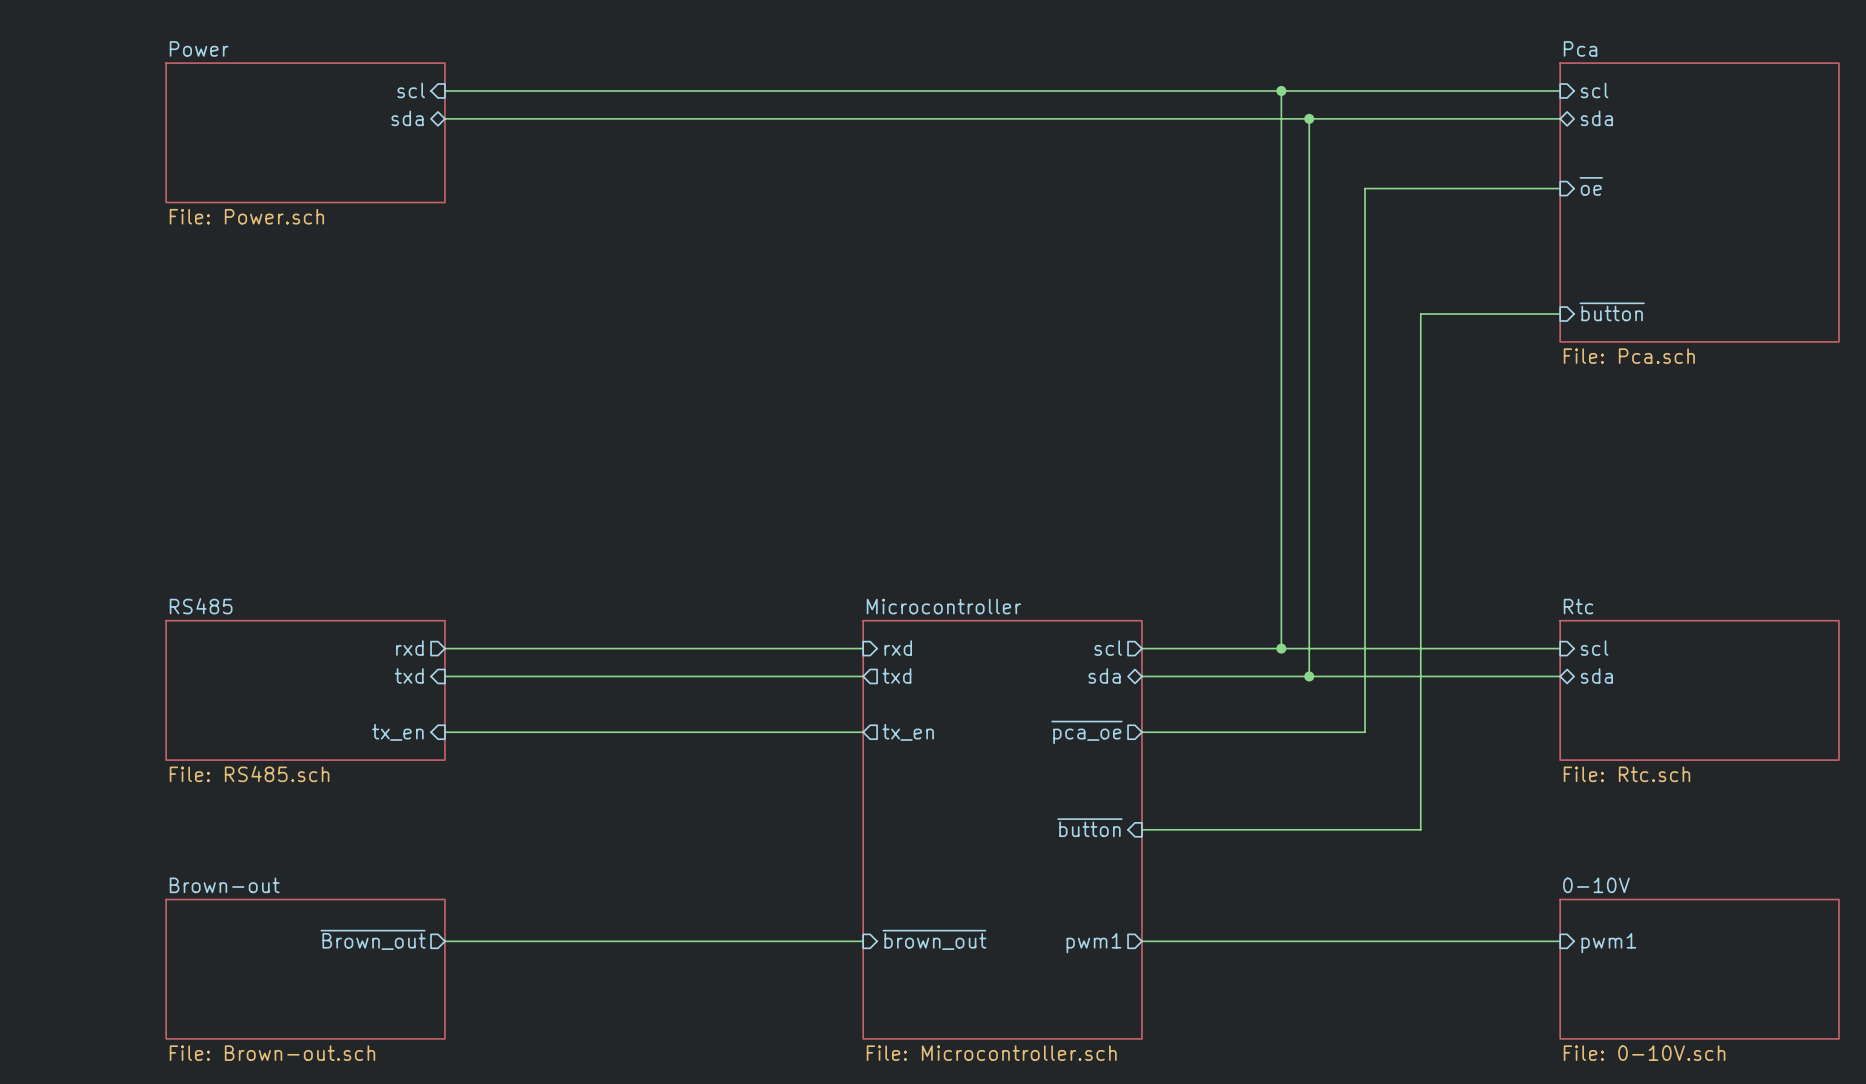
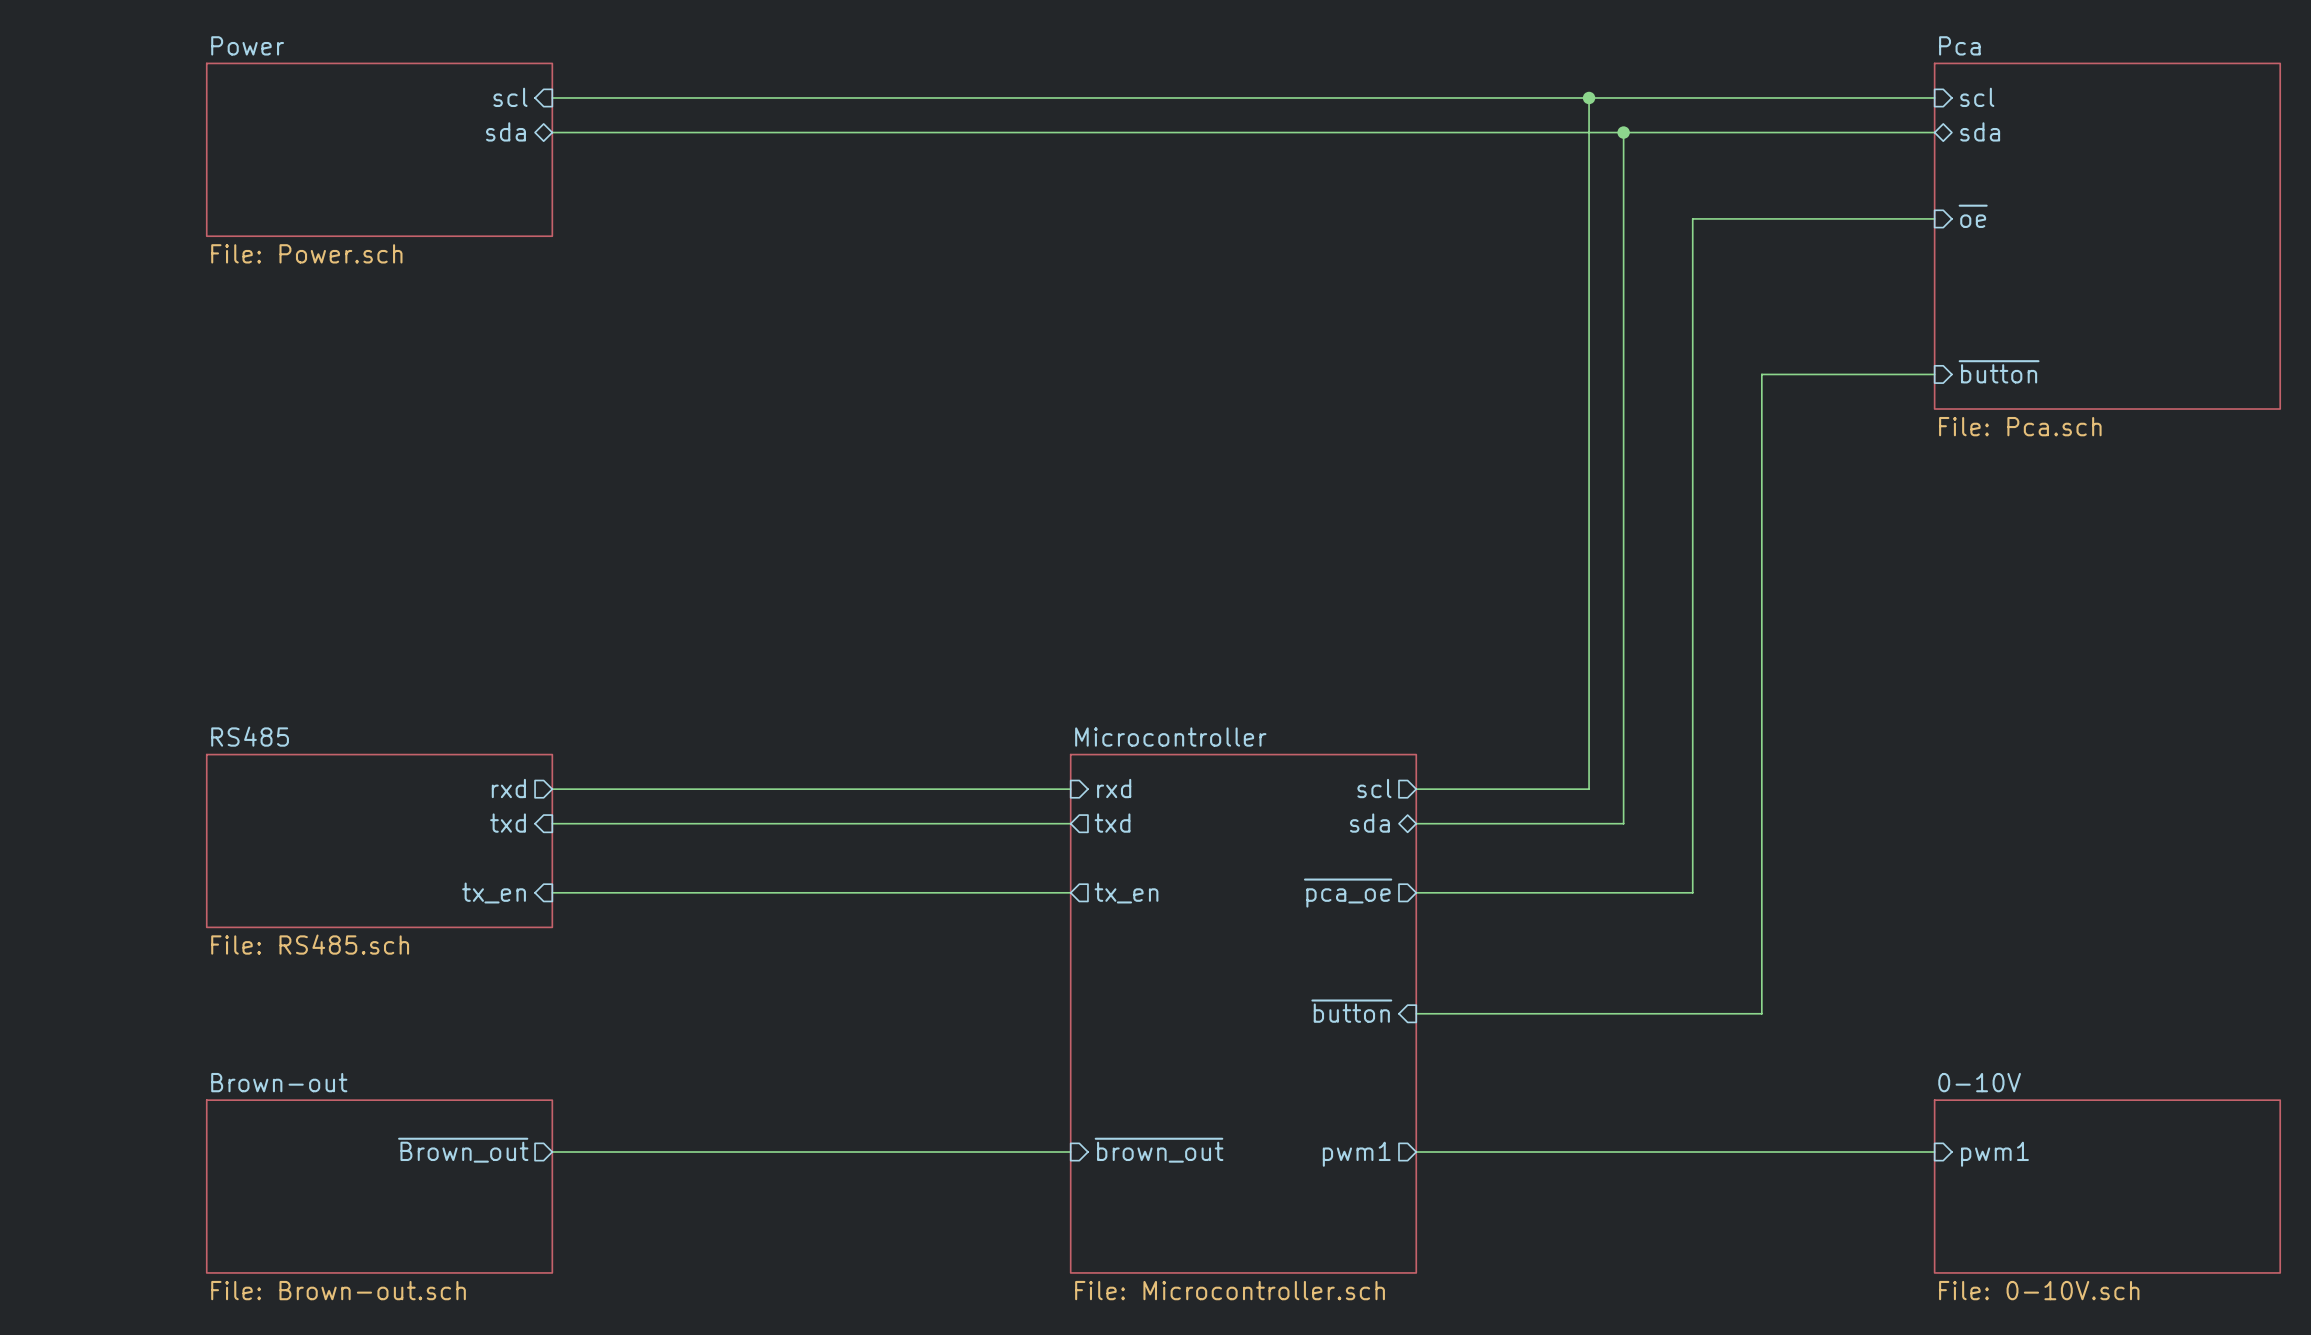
wire: (1281, 648) (1560, 648) -> none
junction: (1281, 648) -> none
sheet pin: scl (1594, 648) -> none
sheet pin: sda (1596, 675) -> none
wire: (1309, 676) (1560, 676) -> none
junction: (1309, 676) -> none
sheet Rtc: File: Rtc.sch (1699, 690) -> none

